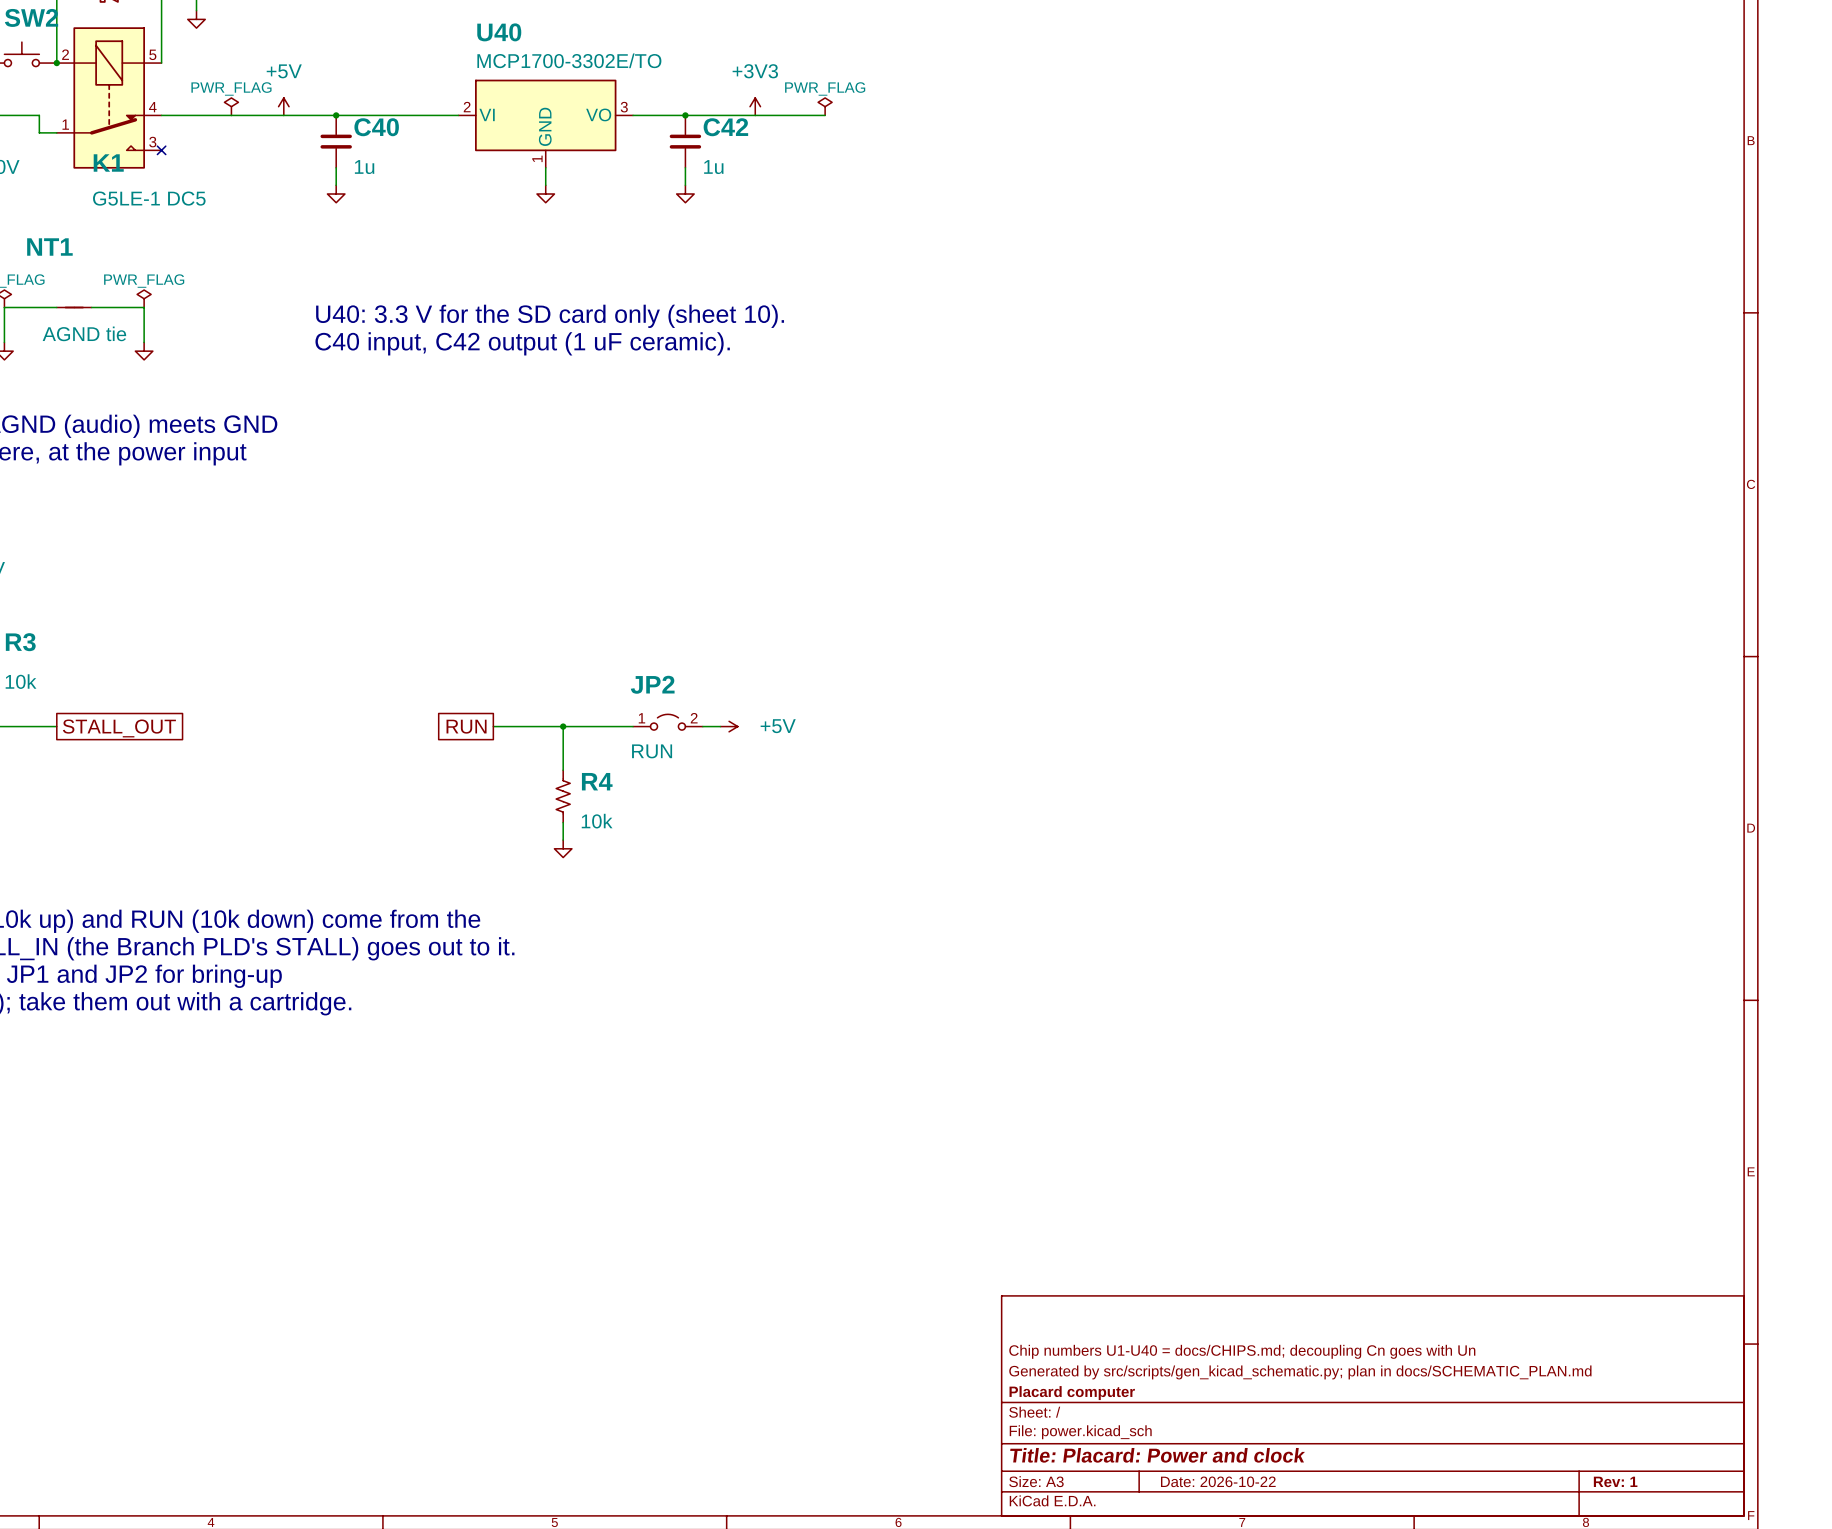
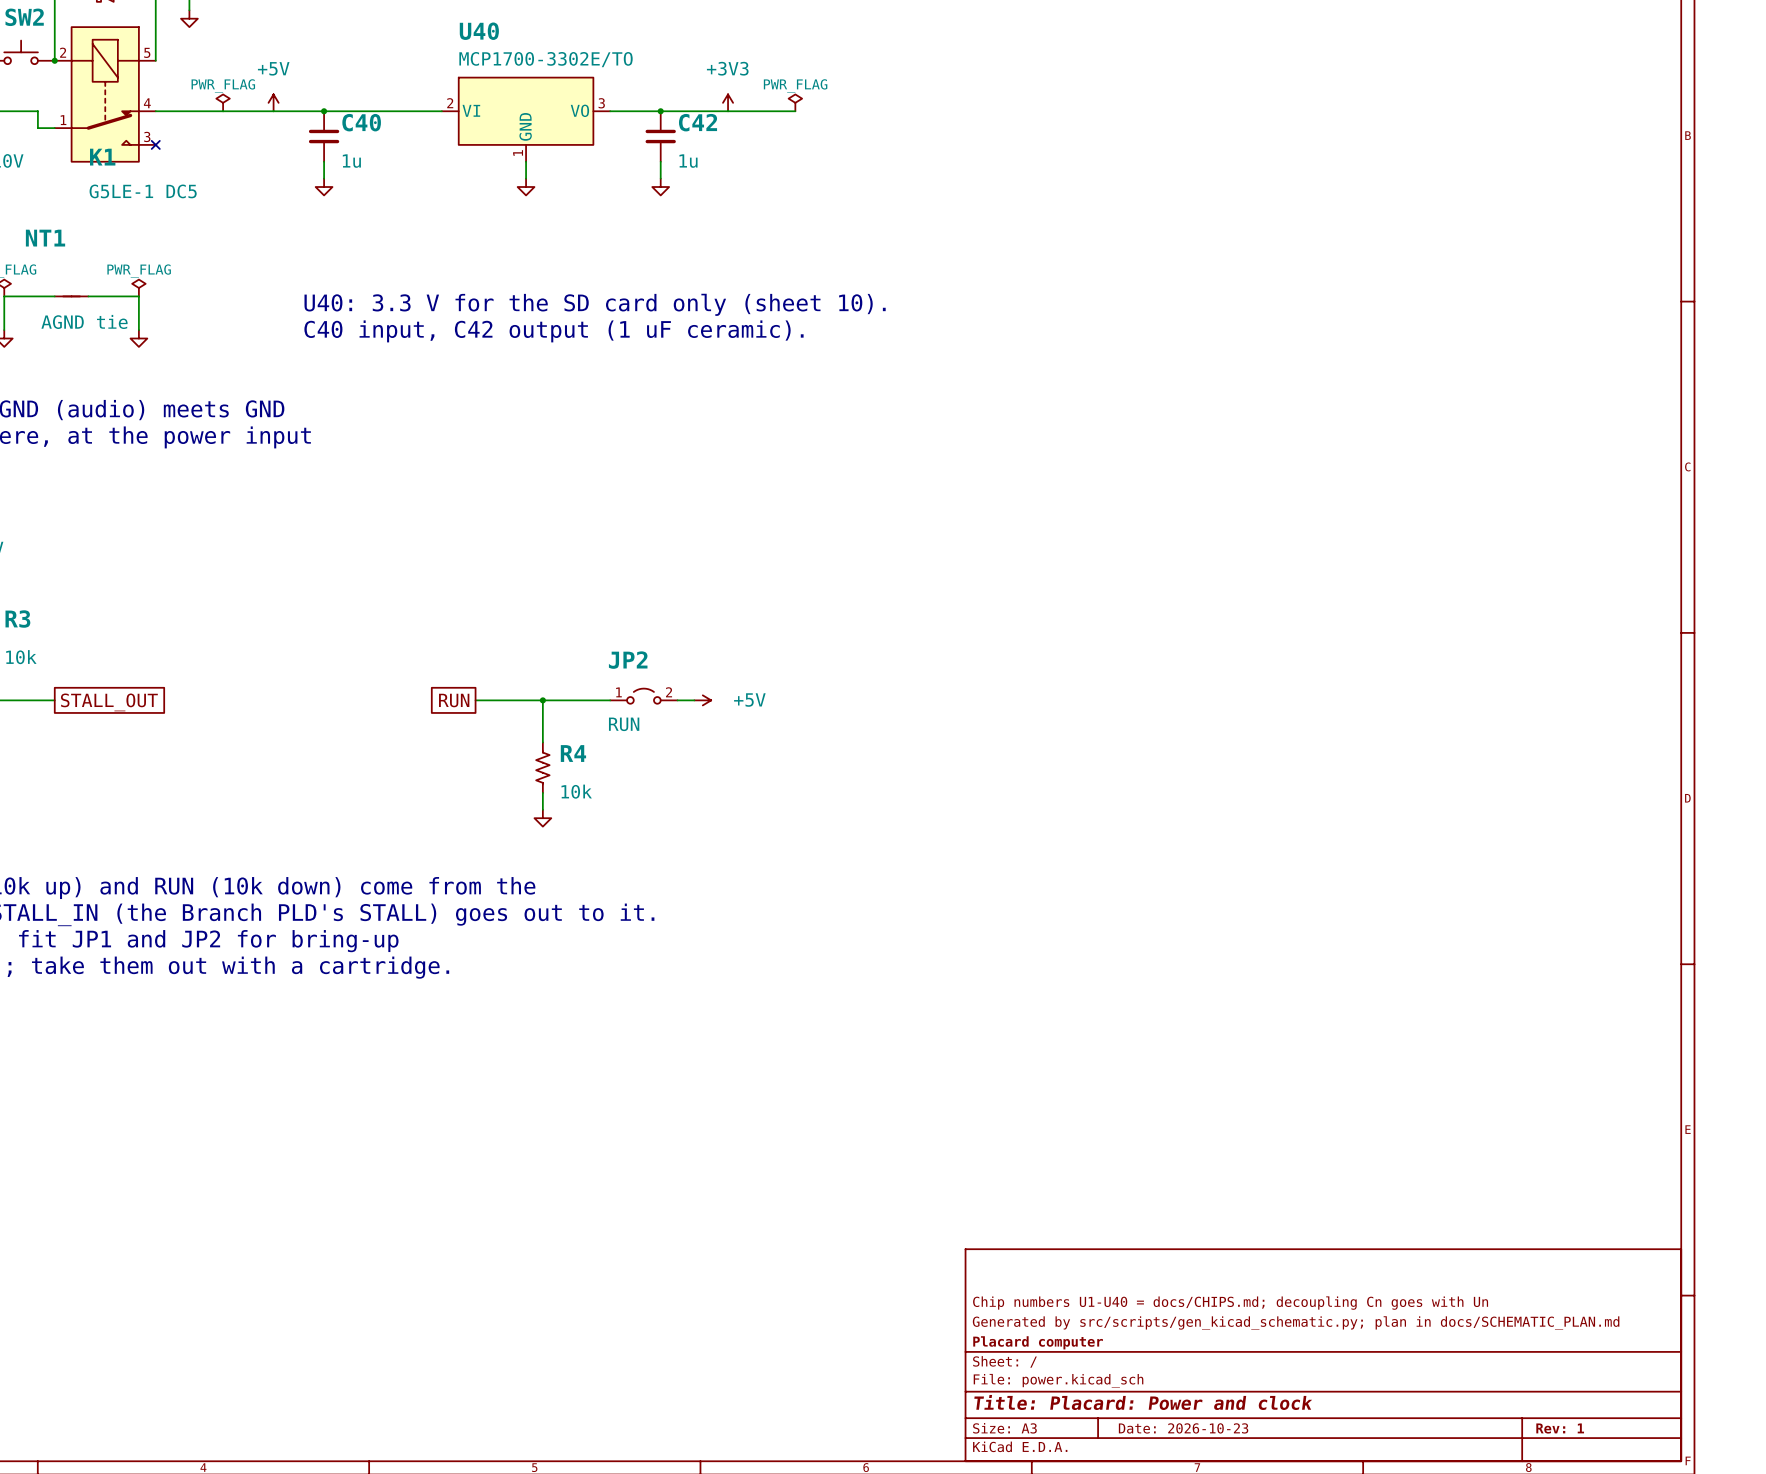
title block: Date: 2026-10-22 (1218, 1481) -> Date: 2026-10-23 (1183, 1428)

